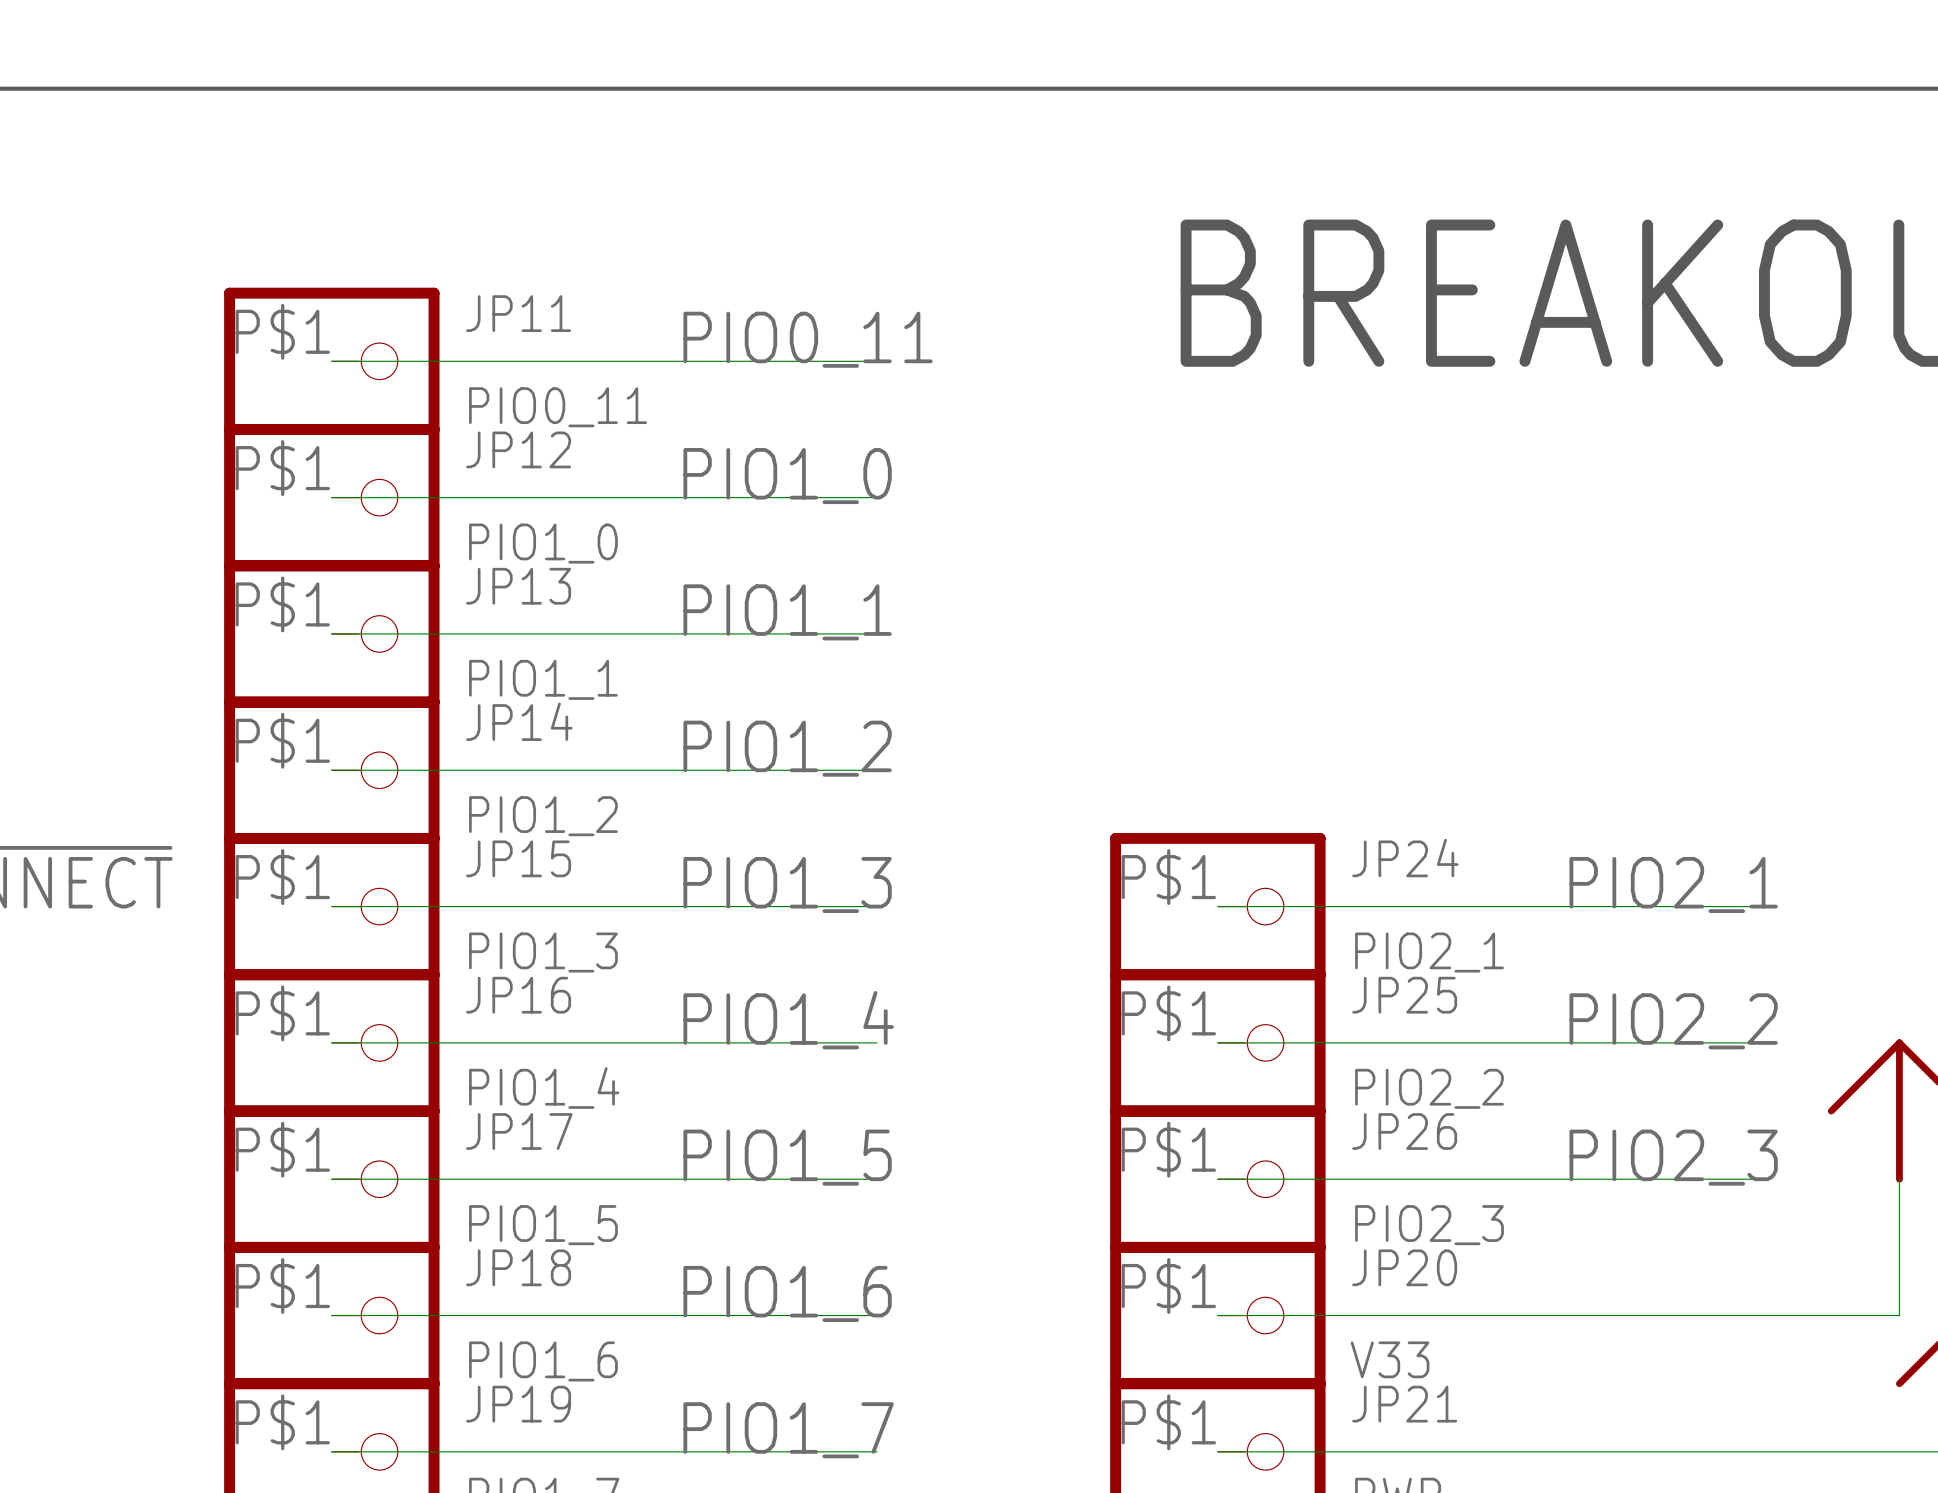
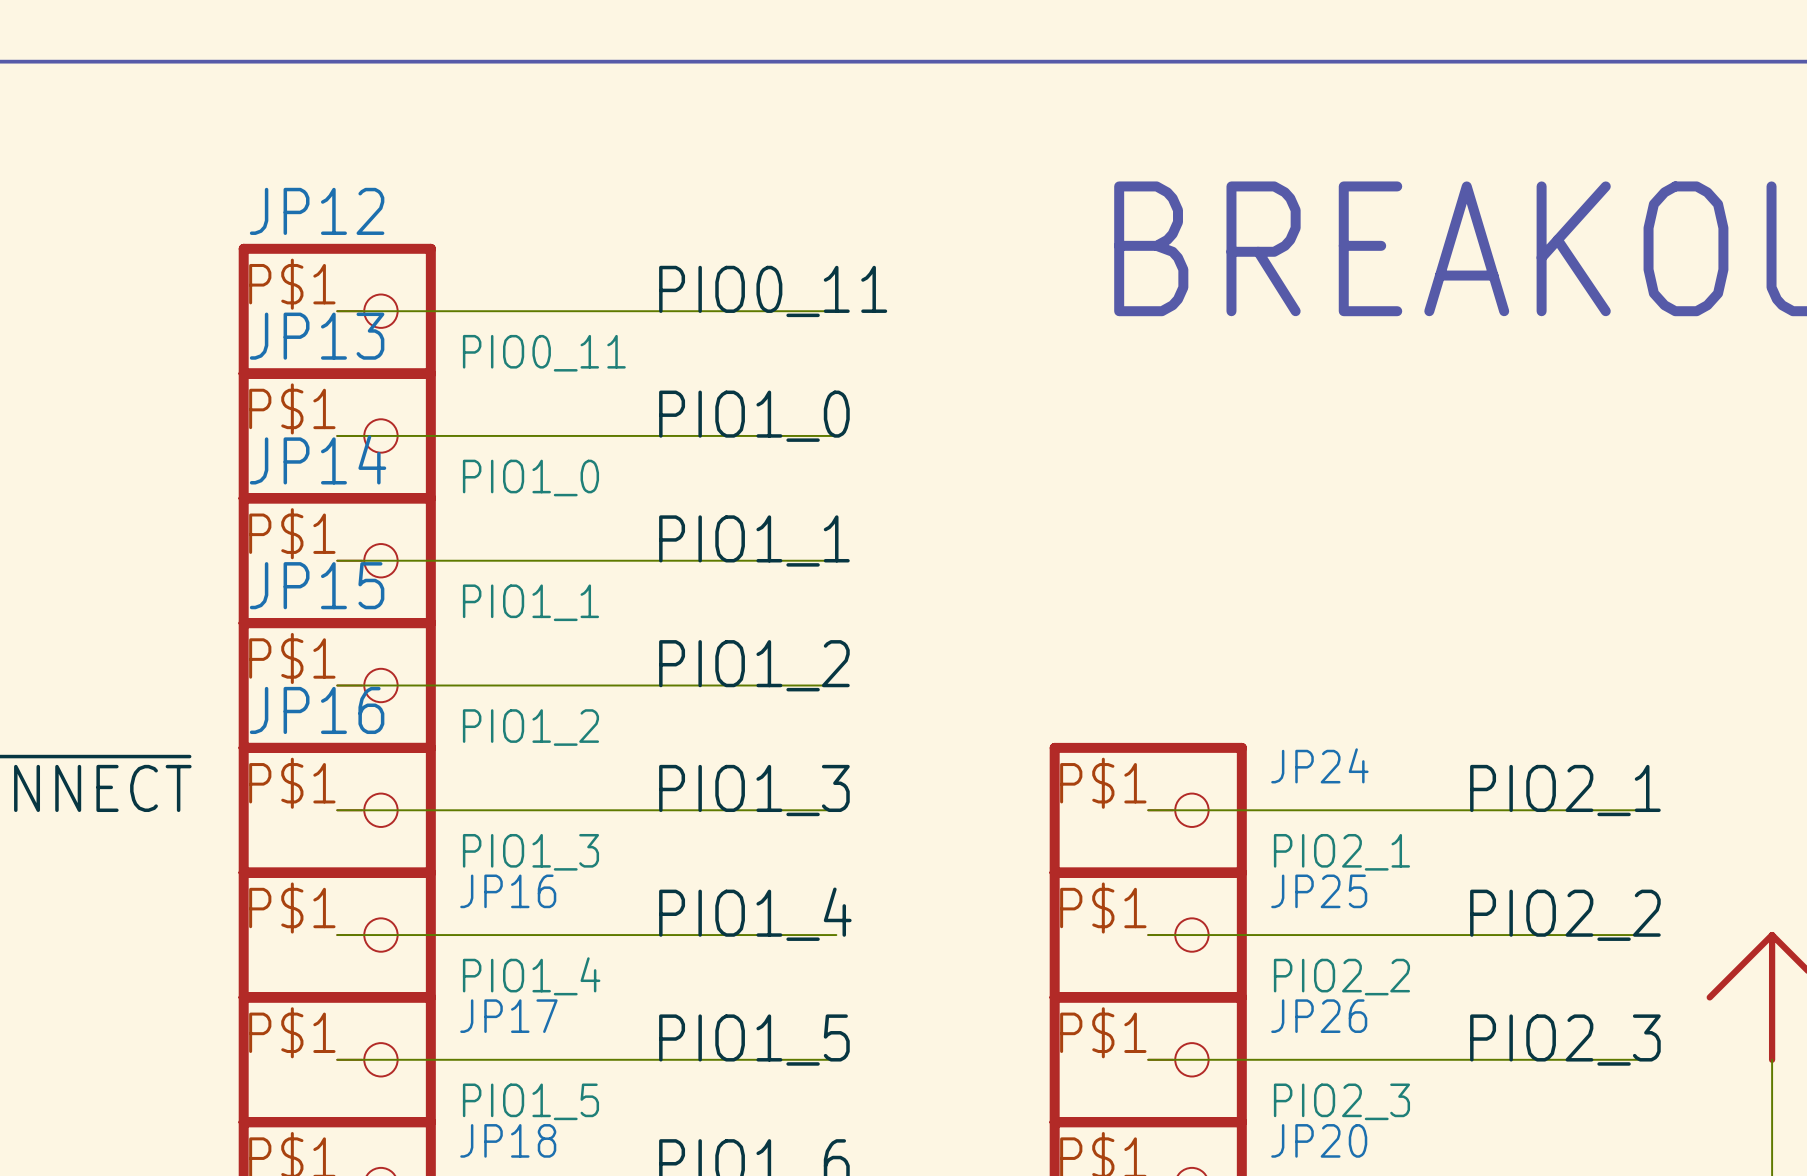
JP11 name: JP11 (518, 313) -> JP12 (317, 211)
JP12 name: JP12 (518, 449) -> JP13 (317, 336)
JP13 name: JP13 (518, 586) -> JP14 (318, 459)
JP14 name: JP14 (519, 721) -> JP15 (317, 585)
JP15 name: JP15 (518, 858) -> JP16 (317, 710)

